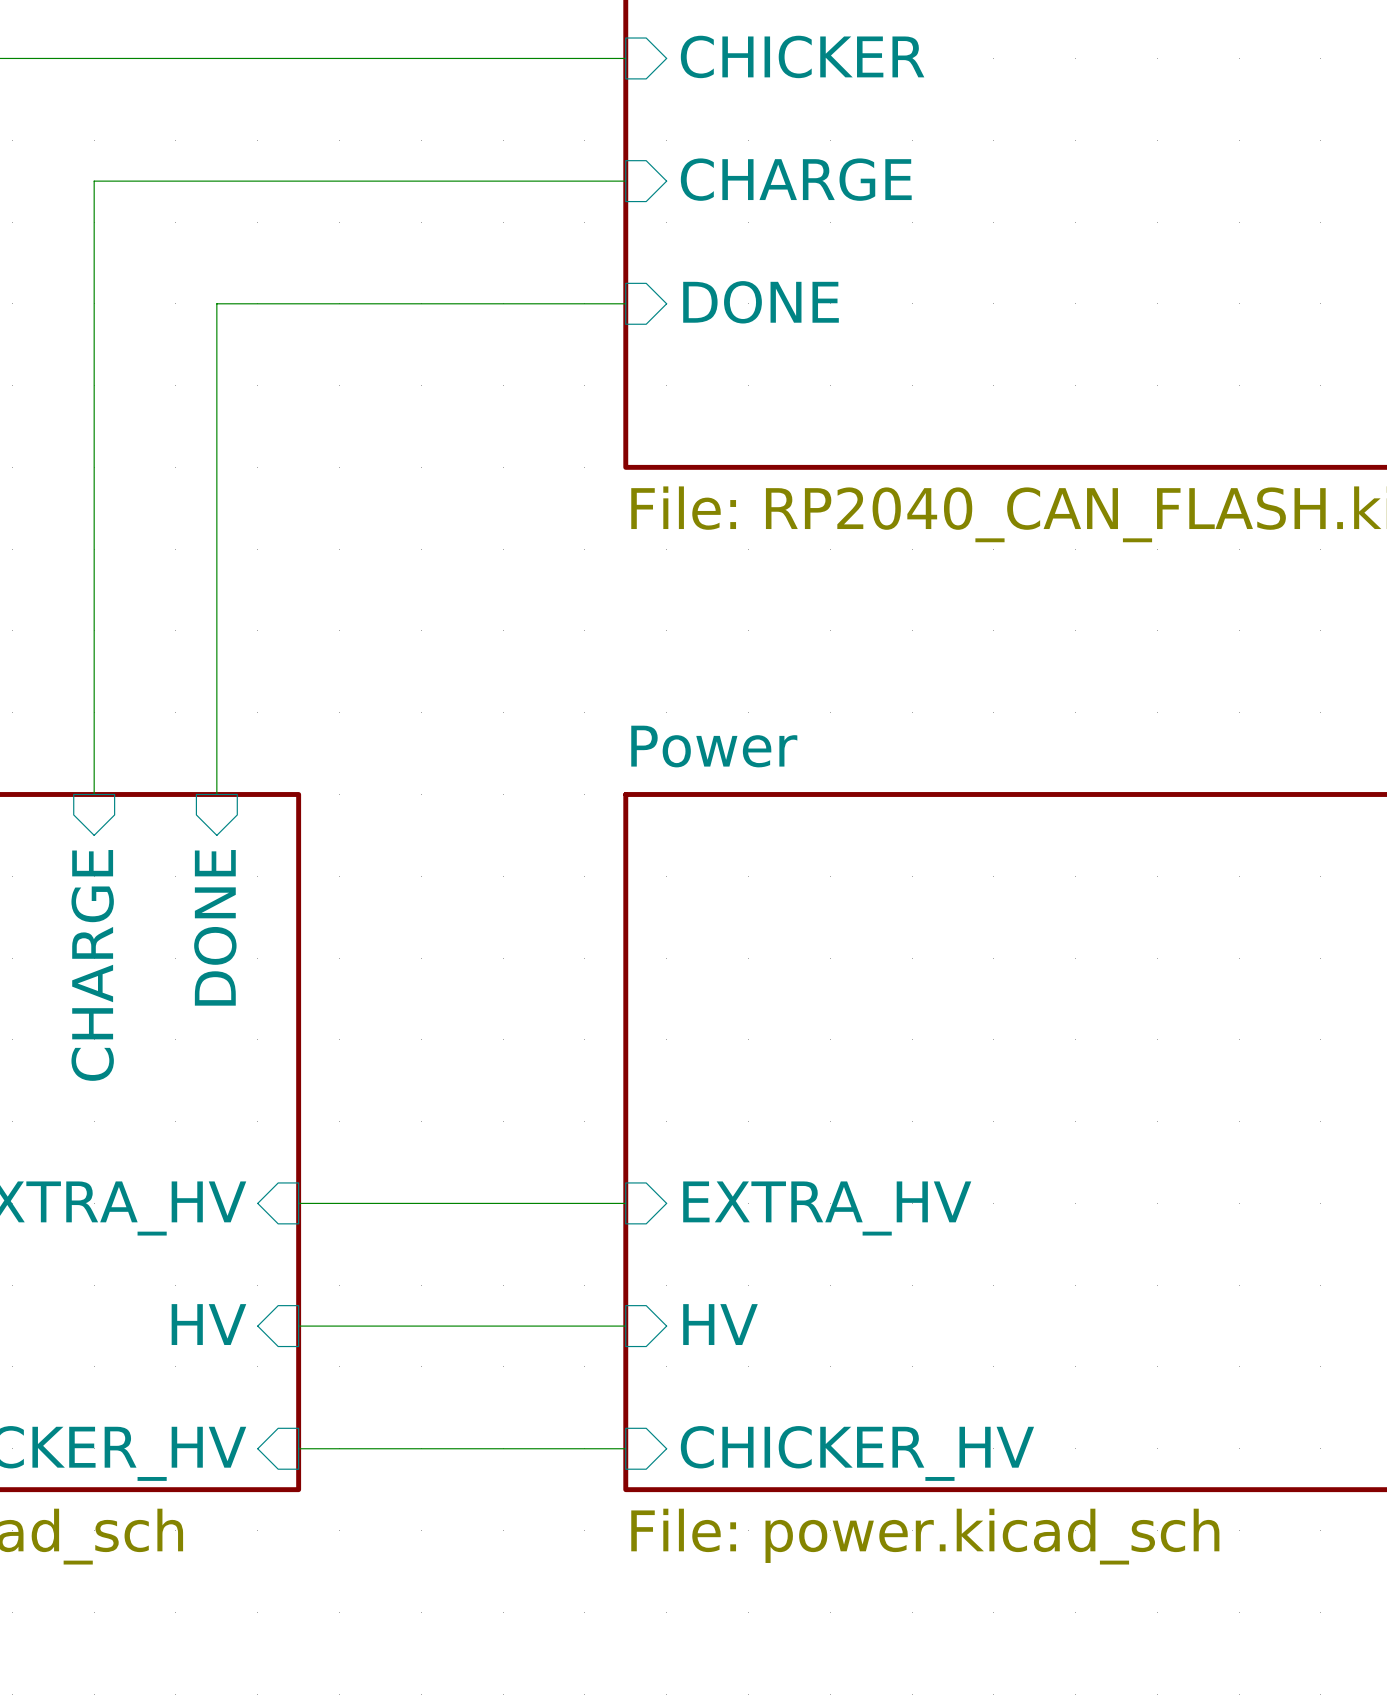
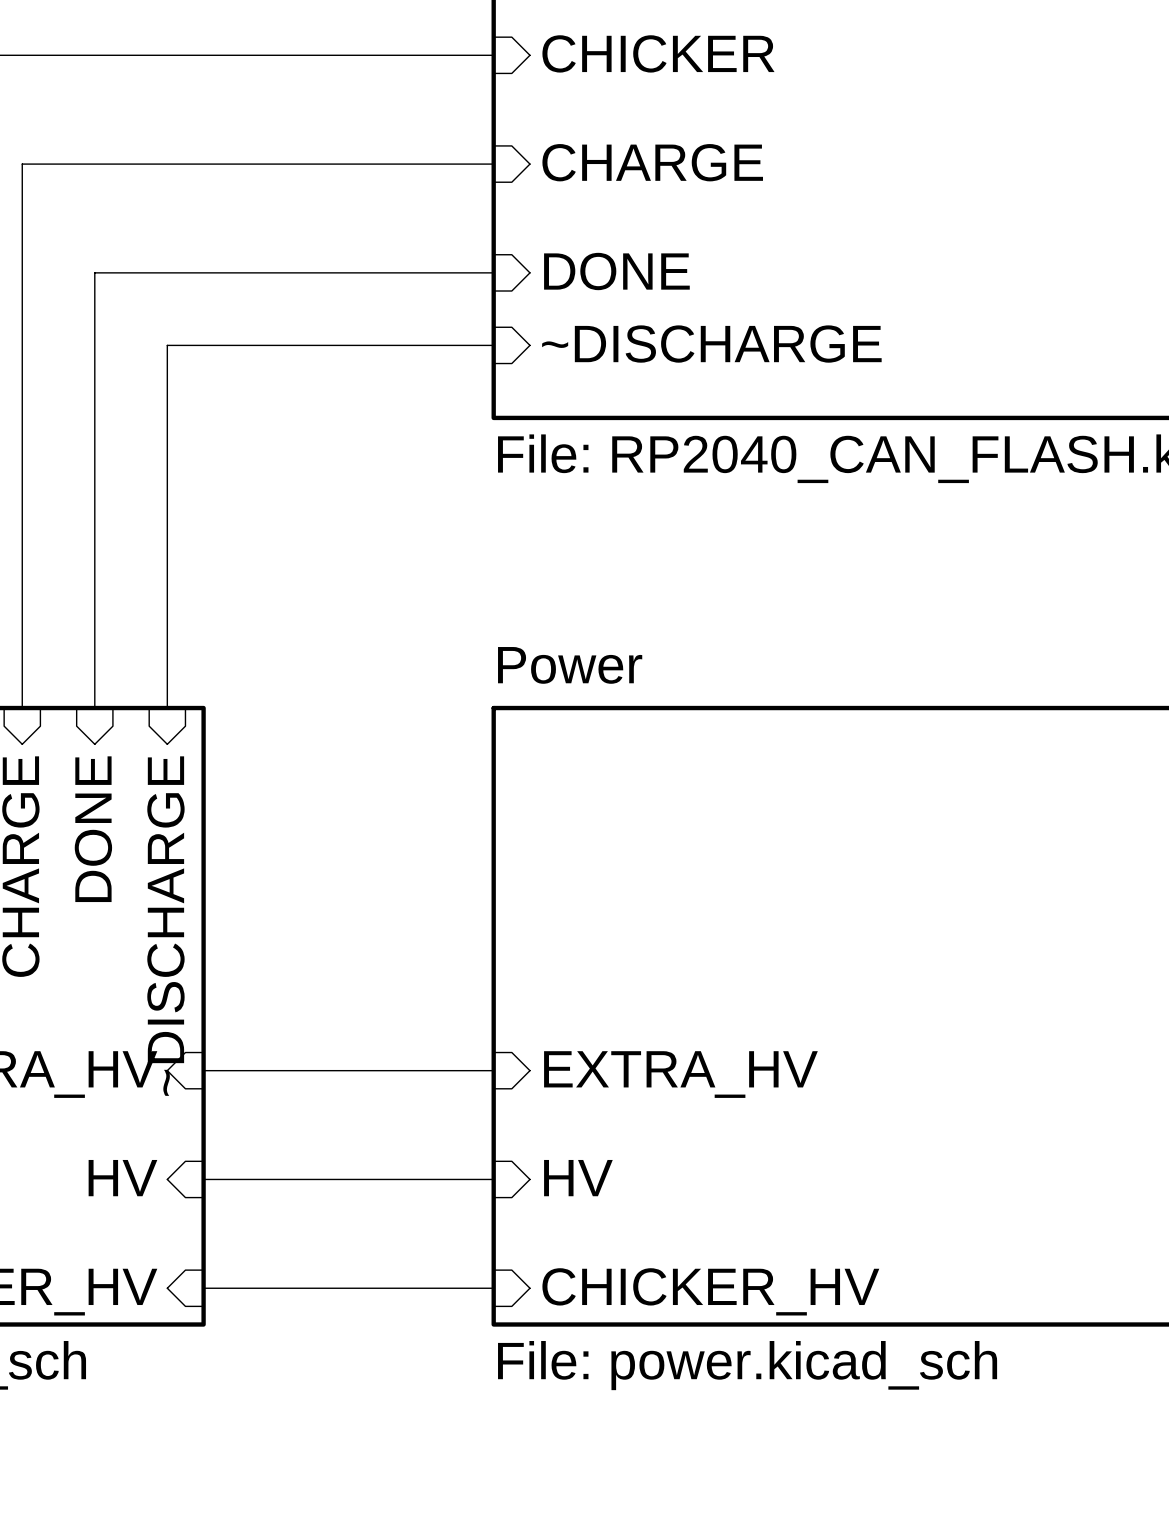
wire: (216, 303) (216, 794) -> (131, 272) (94, 272) (94, 708)
sheet pin: none -> ~DISCHARGE (711, 344)
wire: none -> (493, 345) (167, 345) (167, 708)
sheet pin position: DONE (215, 927) -> DONE (93, 829)
sheet pin: none -> ~DISCHARGE (165, 926)

